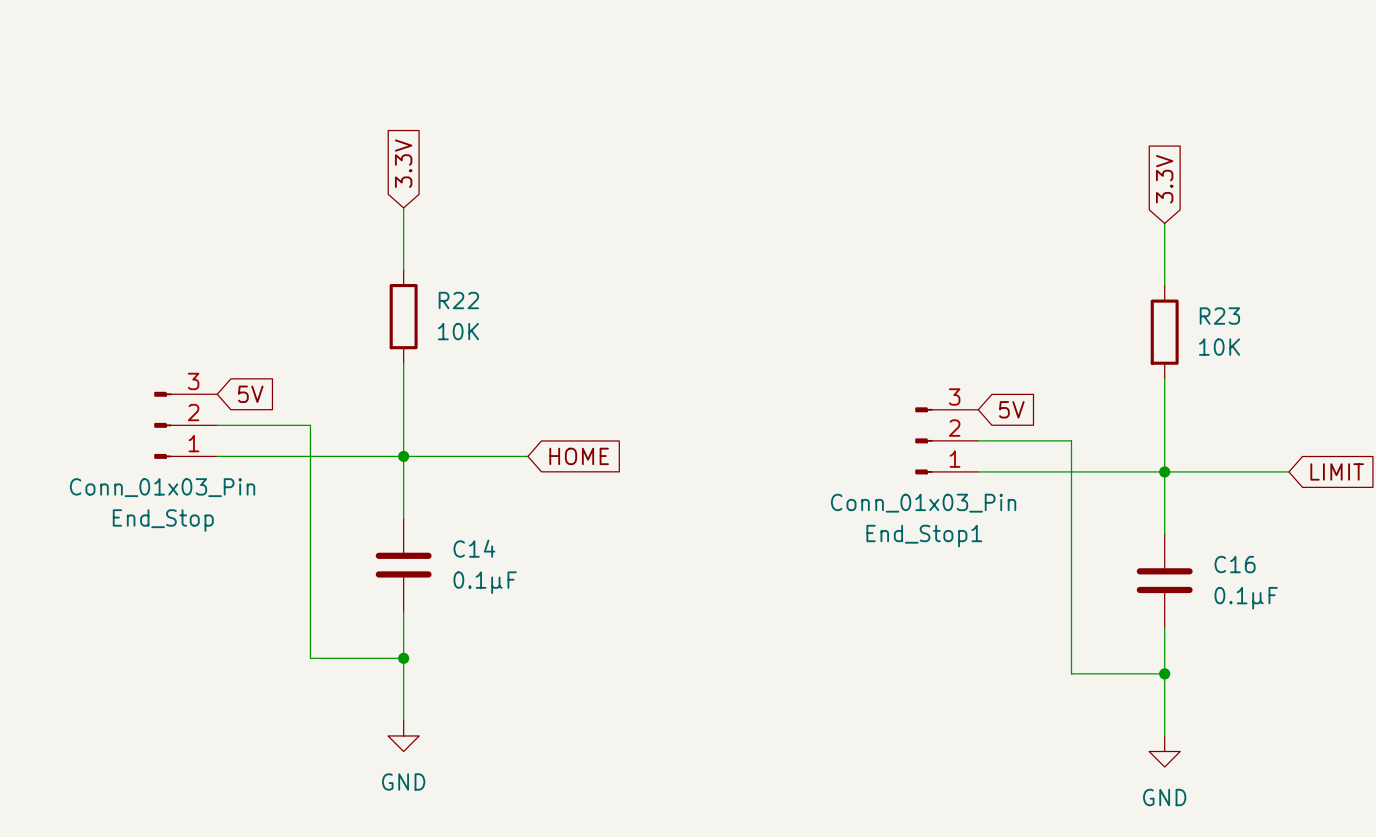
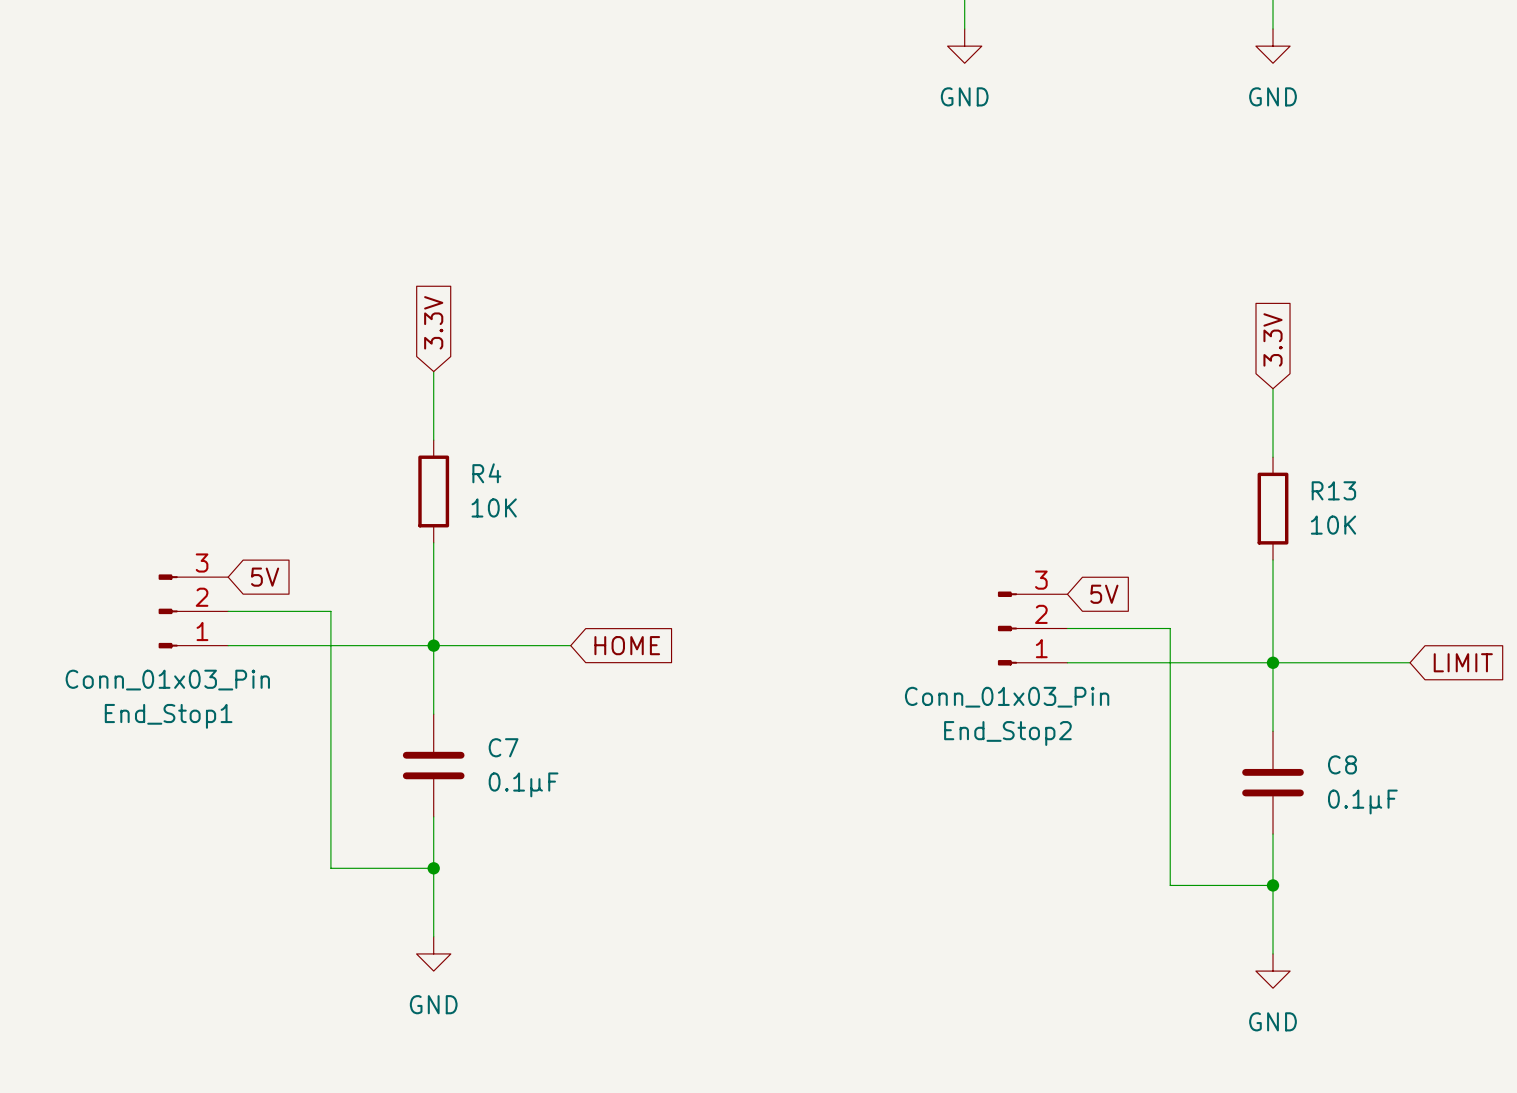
R22 name: R22 (458, 300) -> R4 (486, 473)
R23 name: R23 (1219, 316) -> R13 (1333, 490)
End_Stop name: End_Stop (163, 520) -> End_Stop1 (168, 716)
End_Stop1 name: End_Stop1 (924, 536) -> End_Stop2 (1007, 733)
C14 name: C14 (474, 548) -> C7 (503, 747)
C16 name: C16 (1235, 564) -> C8 (1342, 764)

